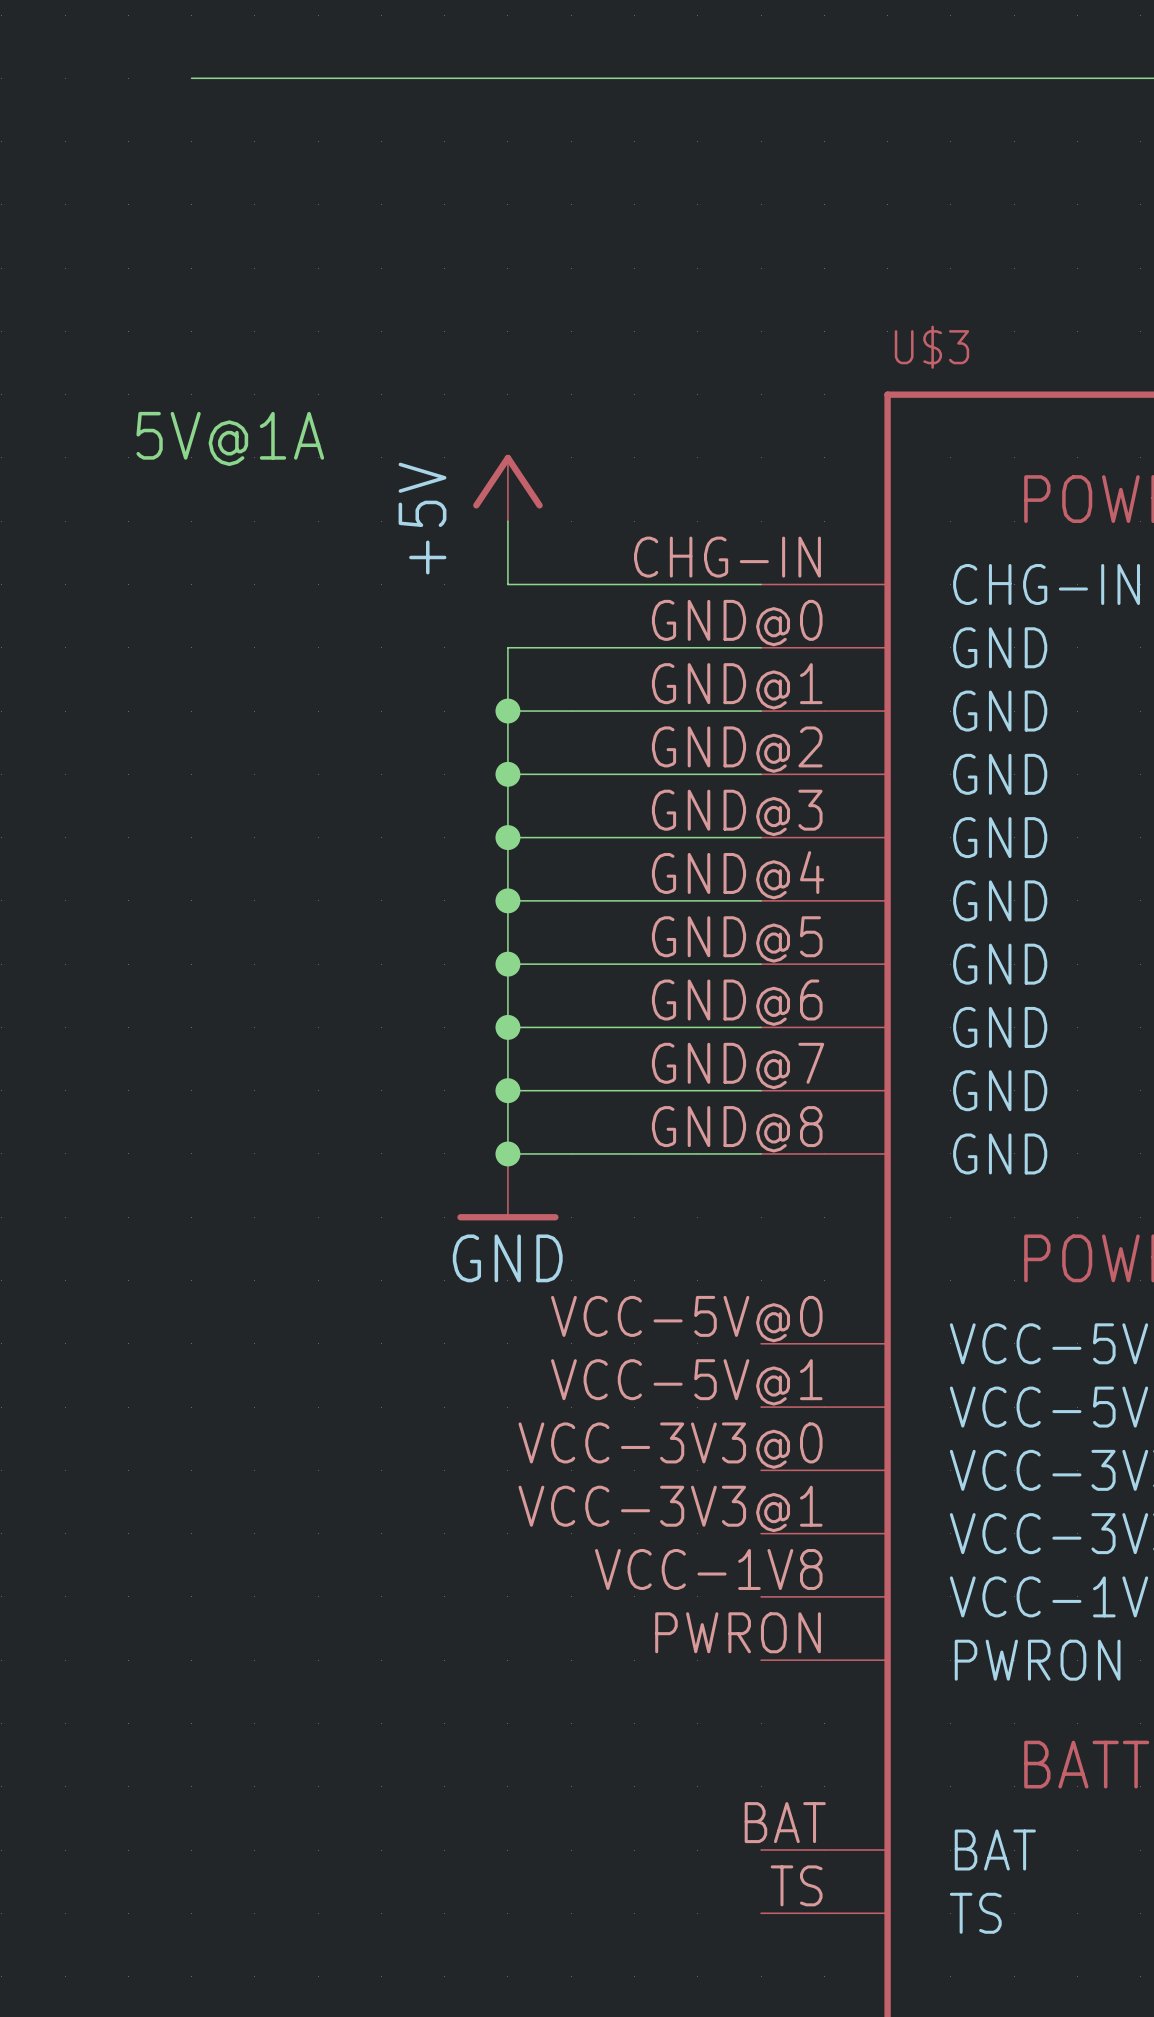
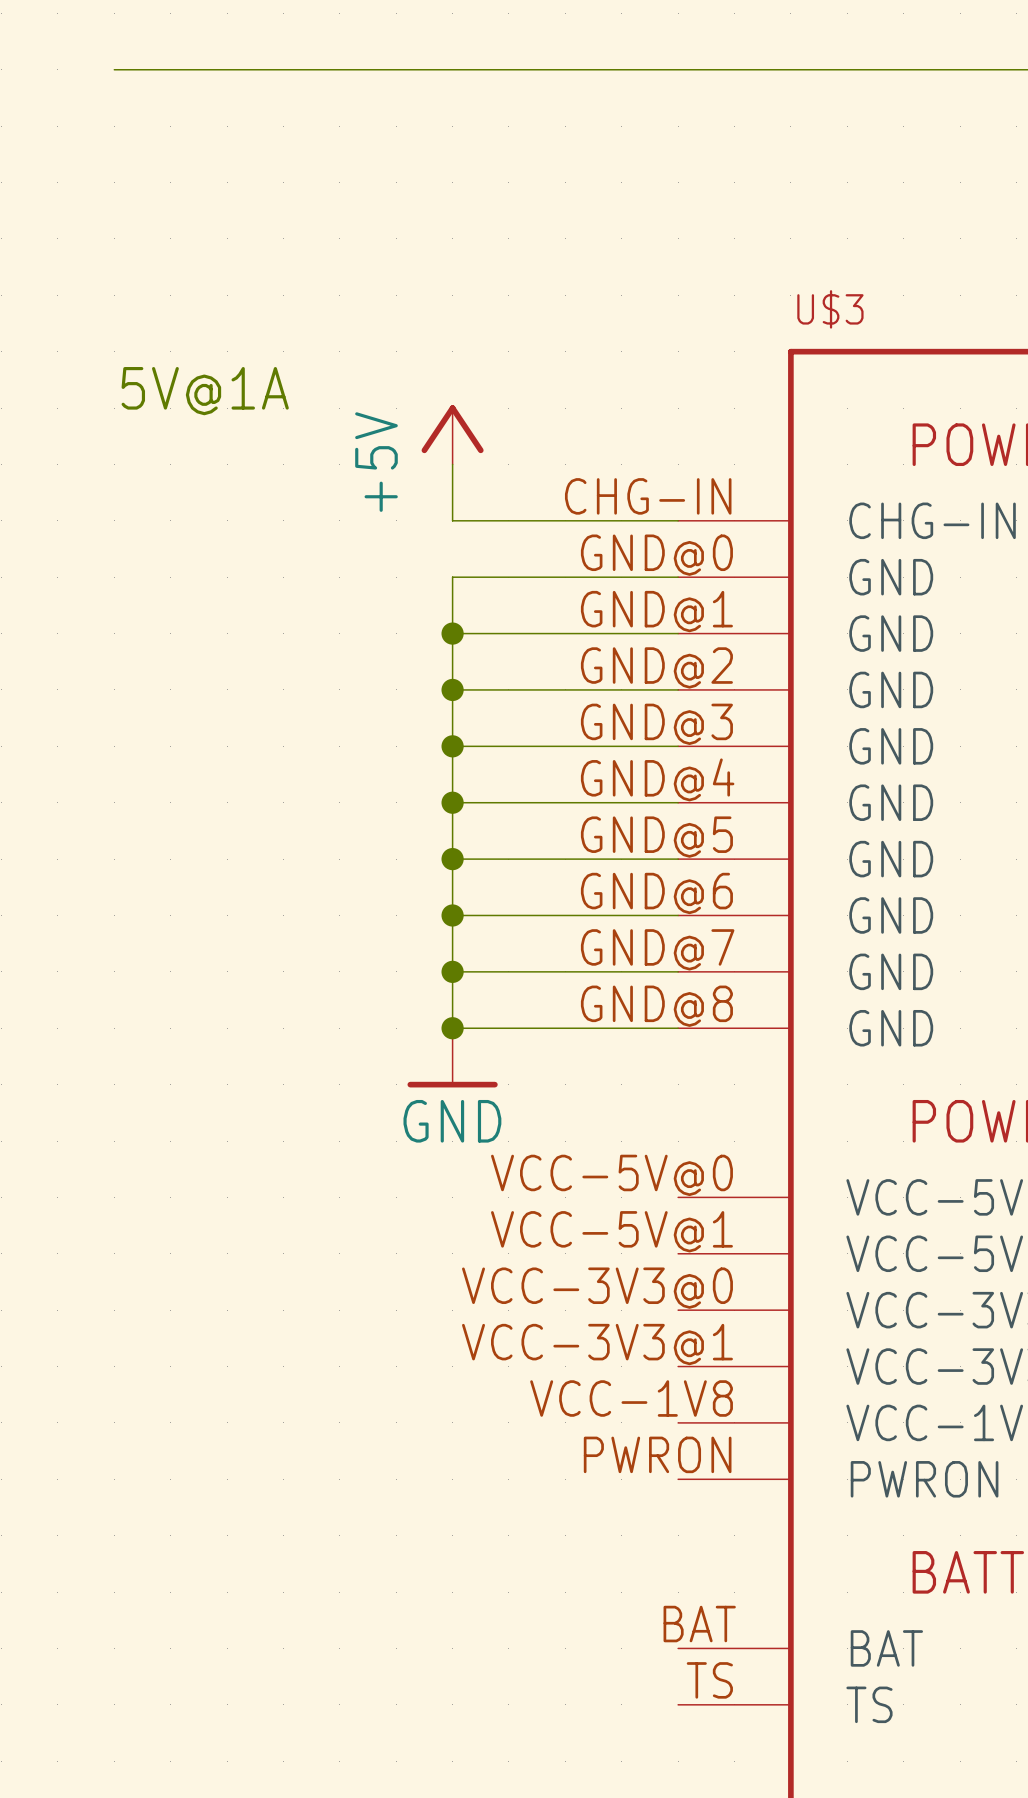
wire: none -> (114, 69) (170, 69)

